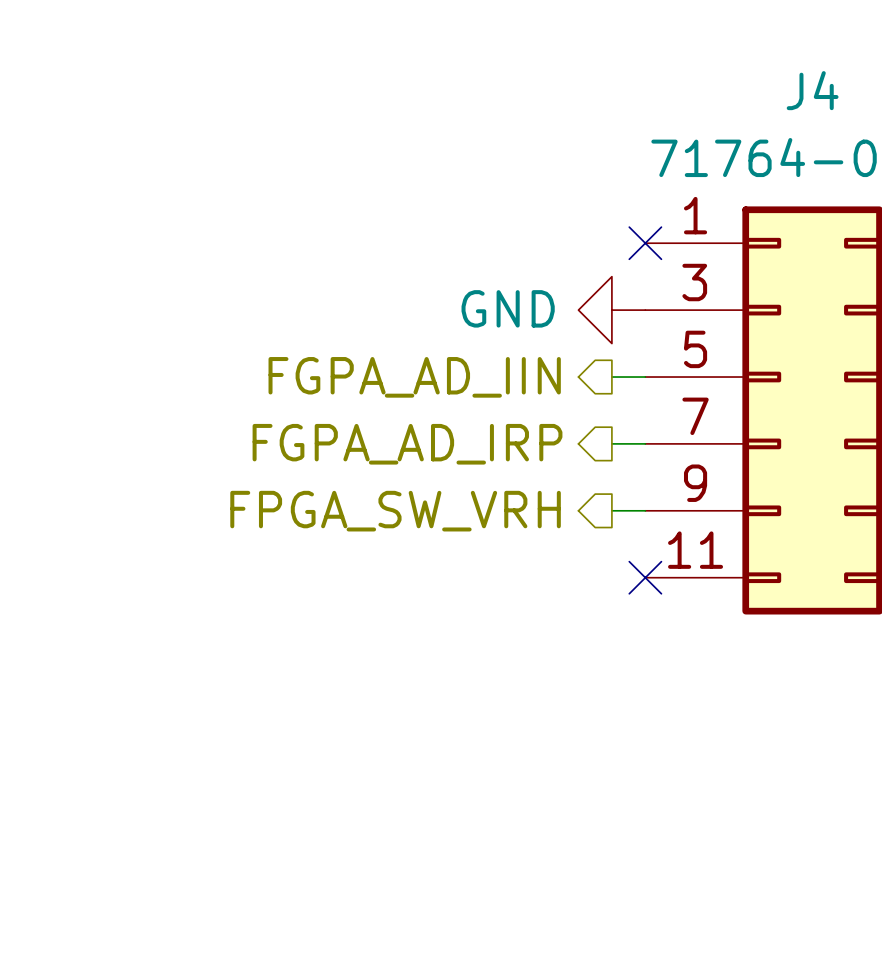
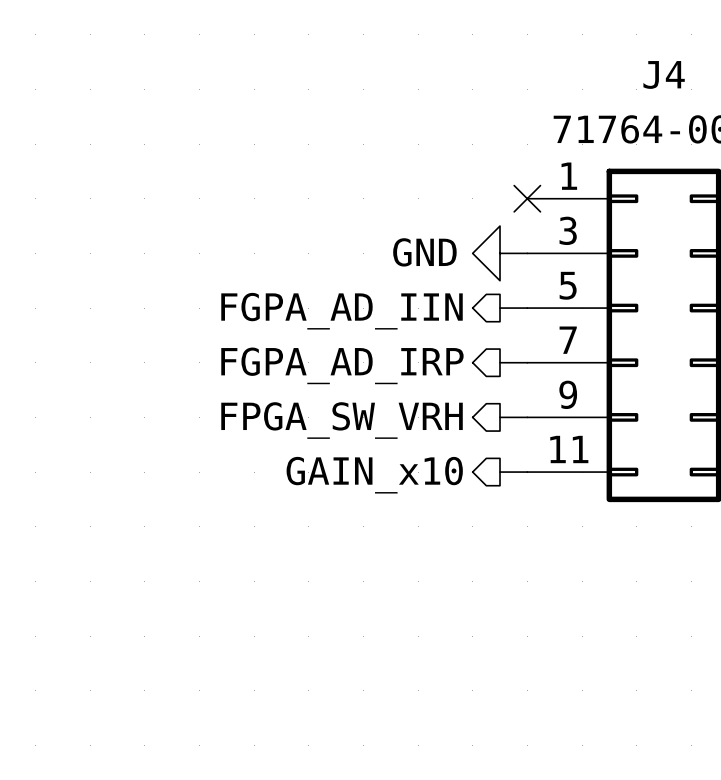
wire: none -> (500, 472) (527, 472)
no-connect mark: (645, 577) -> none
hierarchical label: none -> GAIN_x10 (374, 475)

